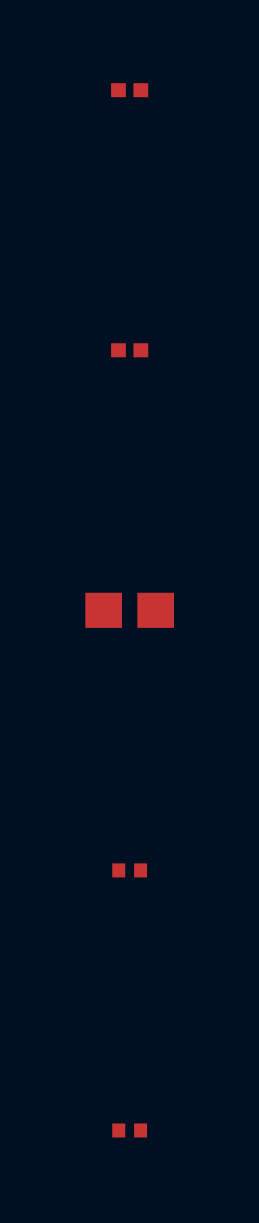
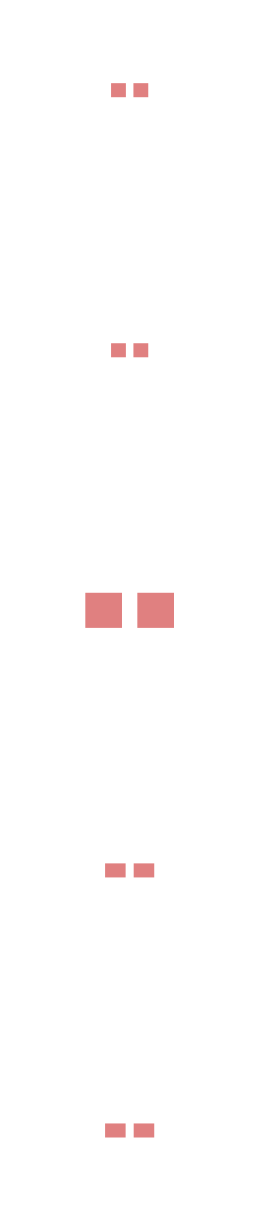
part footprint: [112, 863, 148, 878] -> [105, 863, 155, 878]
part footprint: [112, 1123, 148, 1138] -> [105, 1123, 155, 1138]

